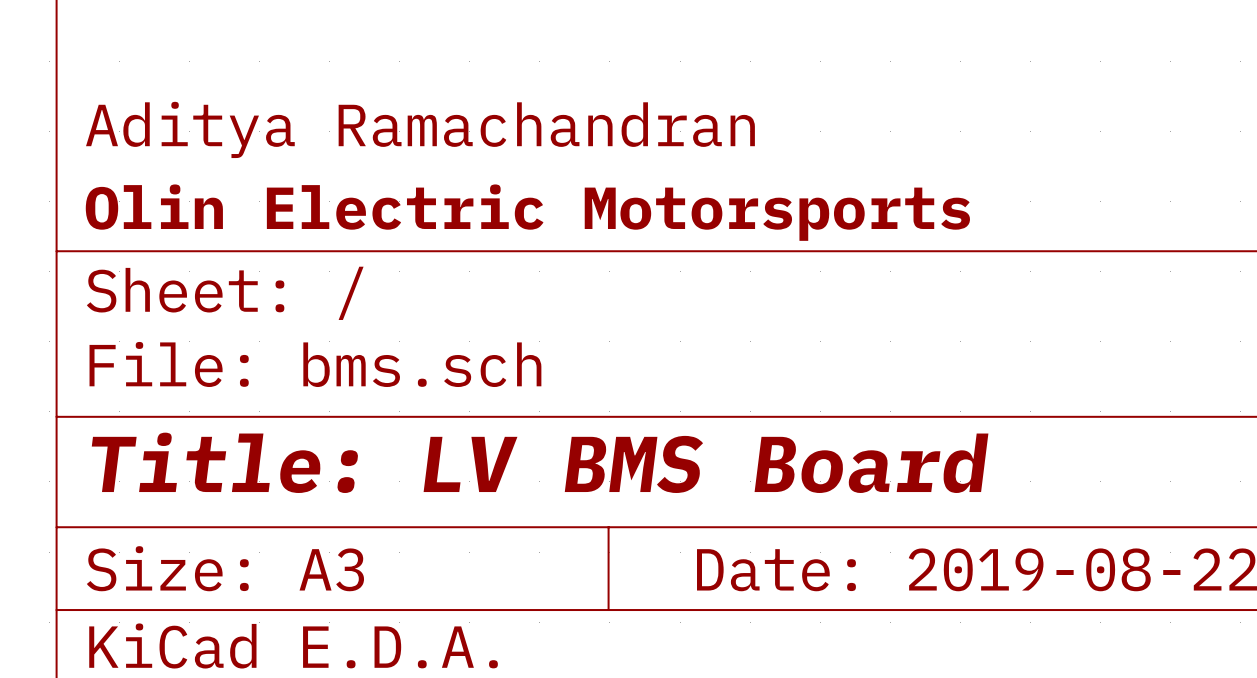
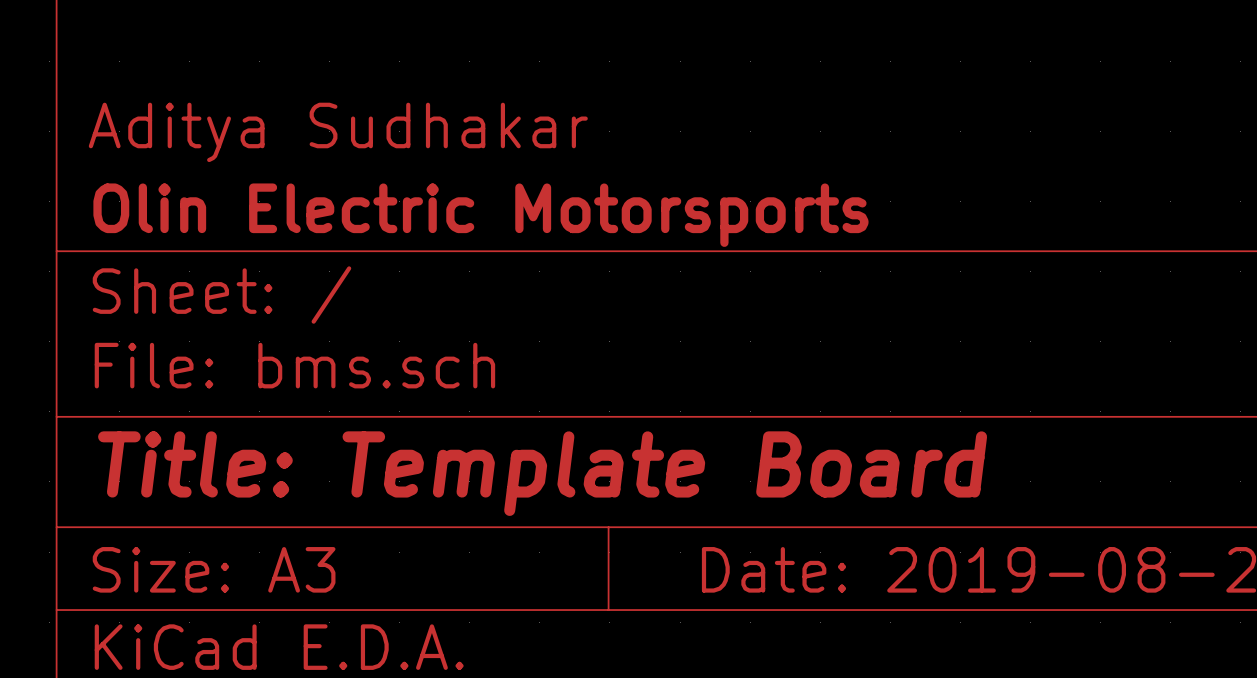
title block: Aditya Ramachandran (420, 129) -> Aditya Sudhakar (338, 132)
title block: Title: LV BMS Board (540, 462) -> Title: Template Board (542, 473)

